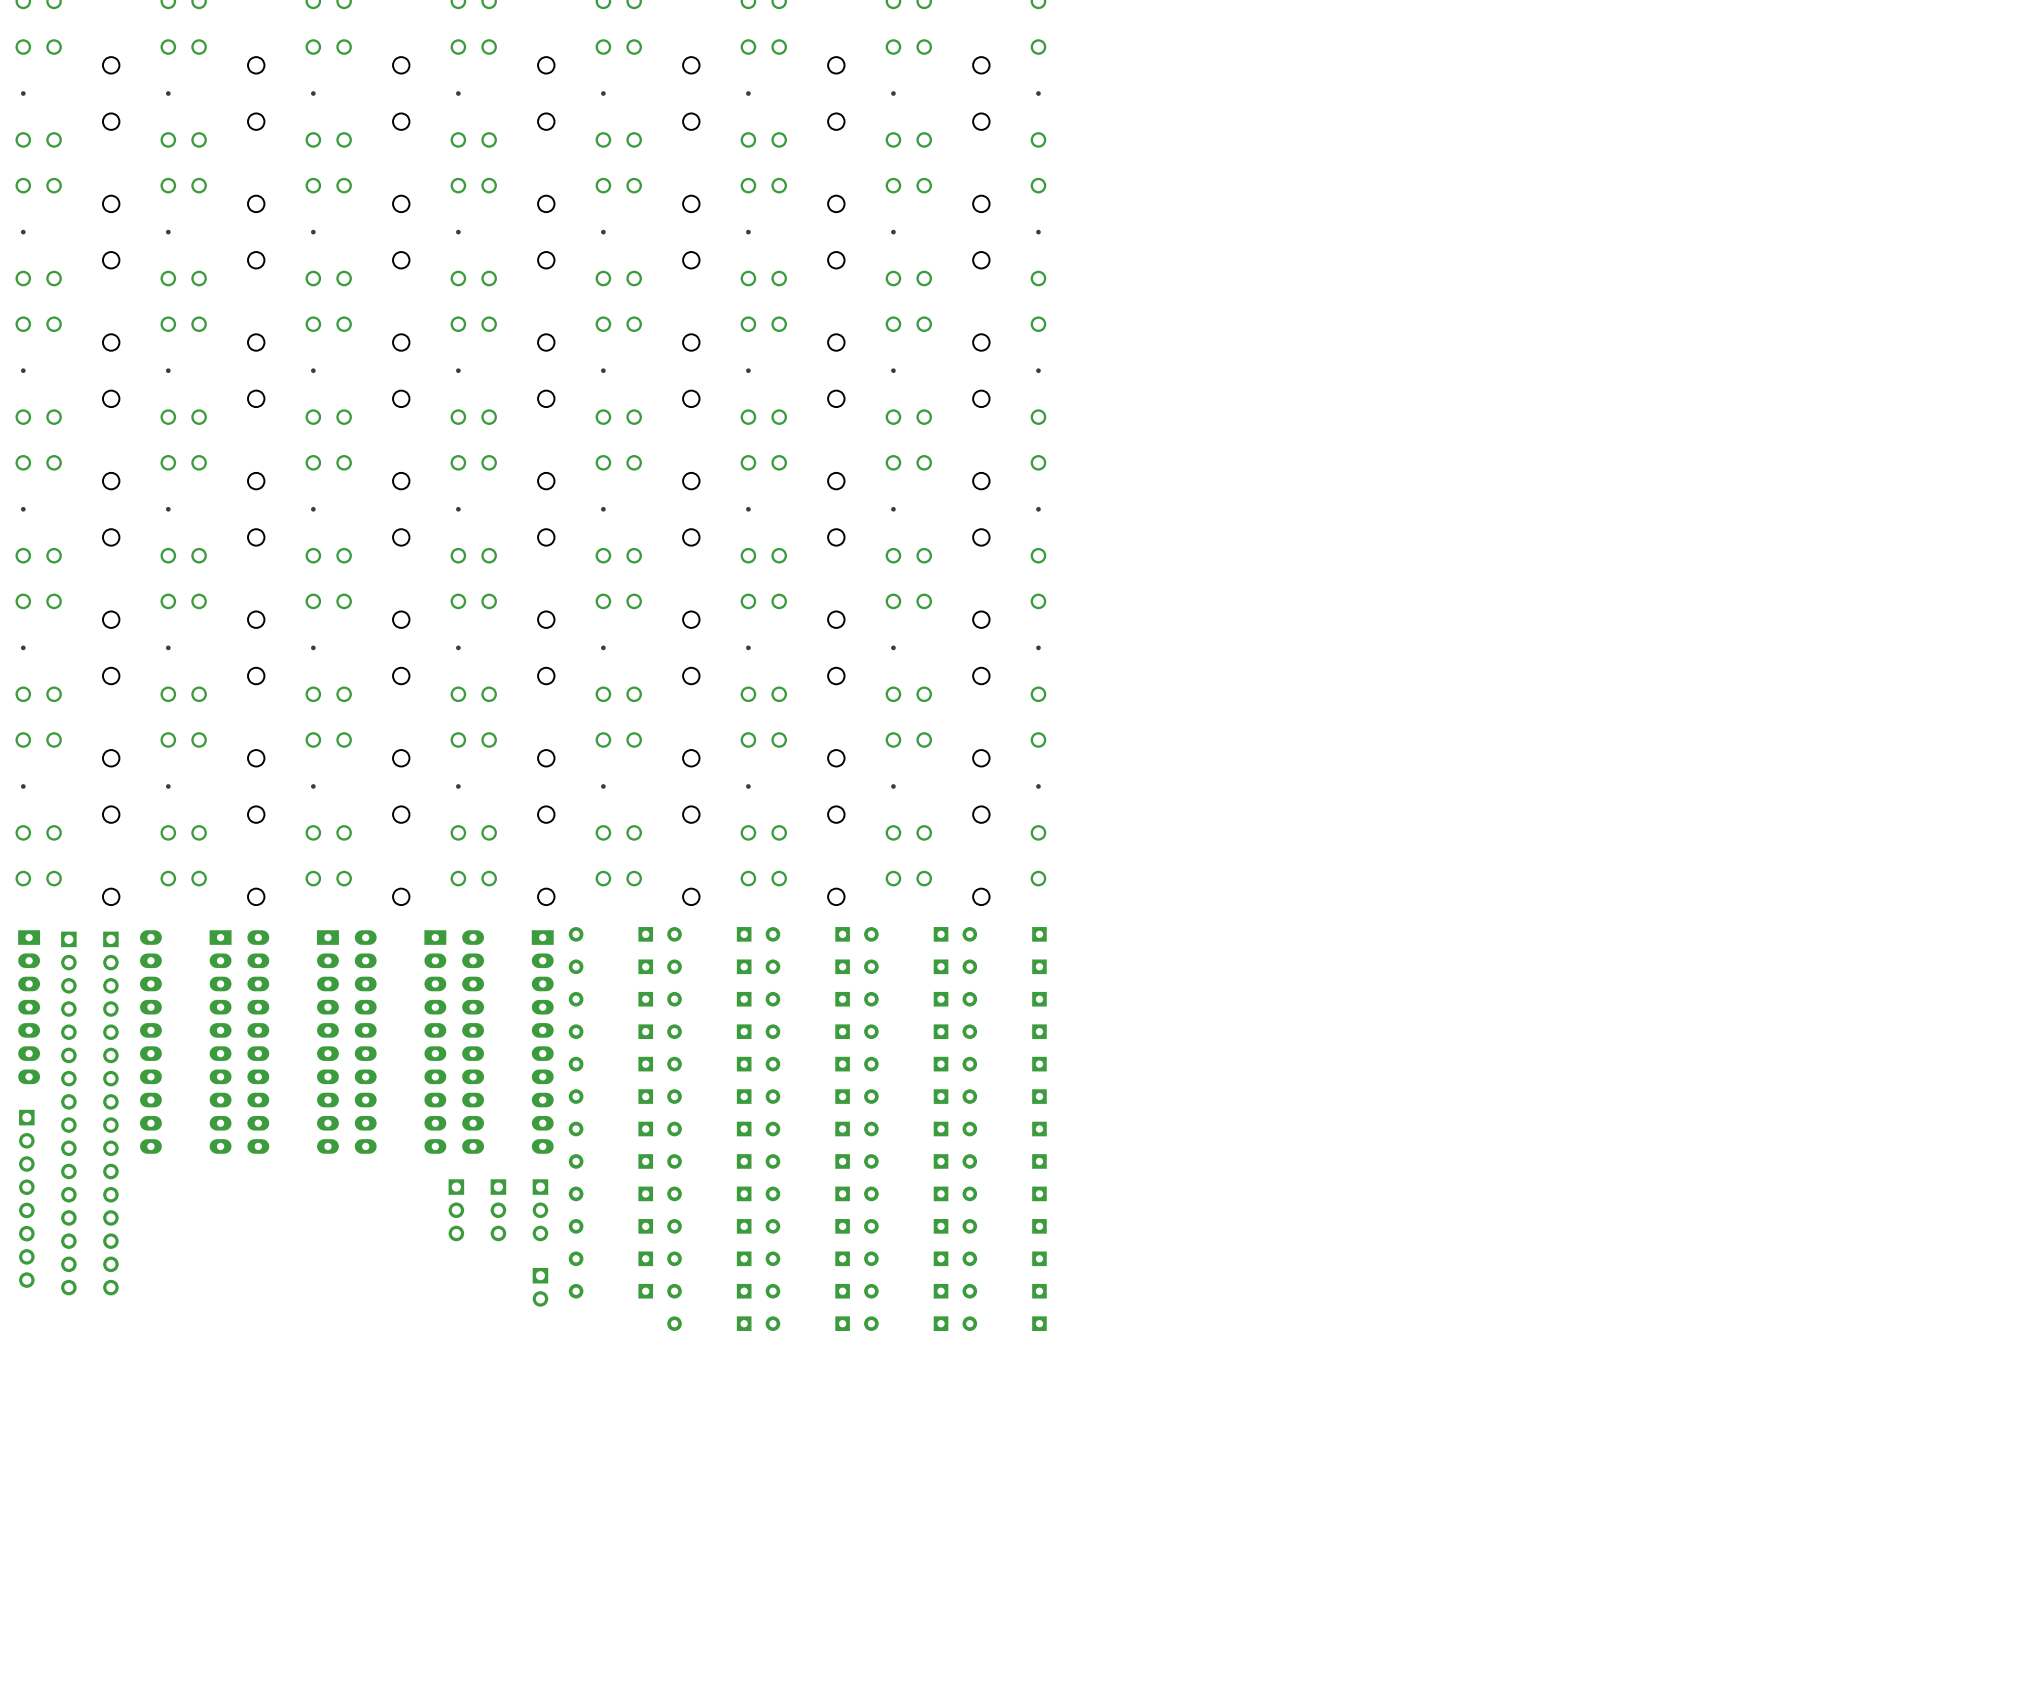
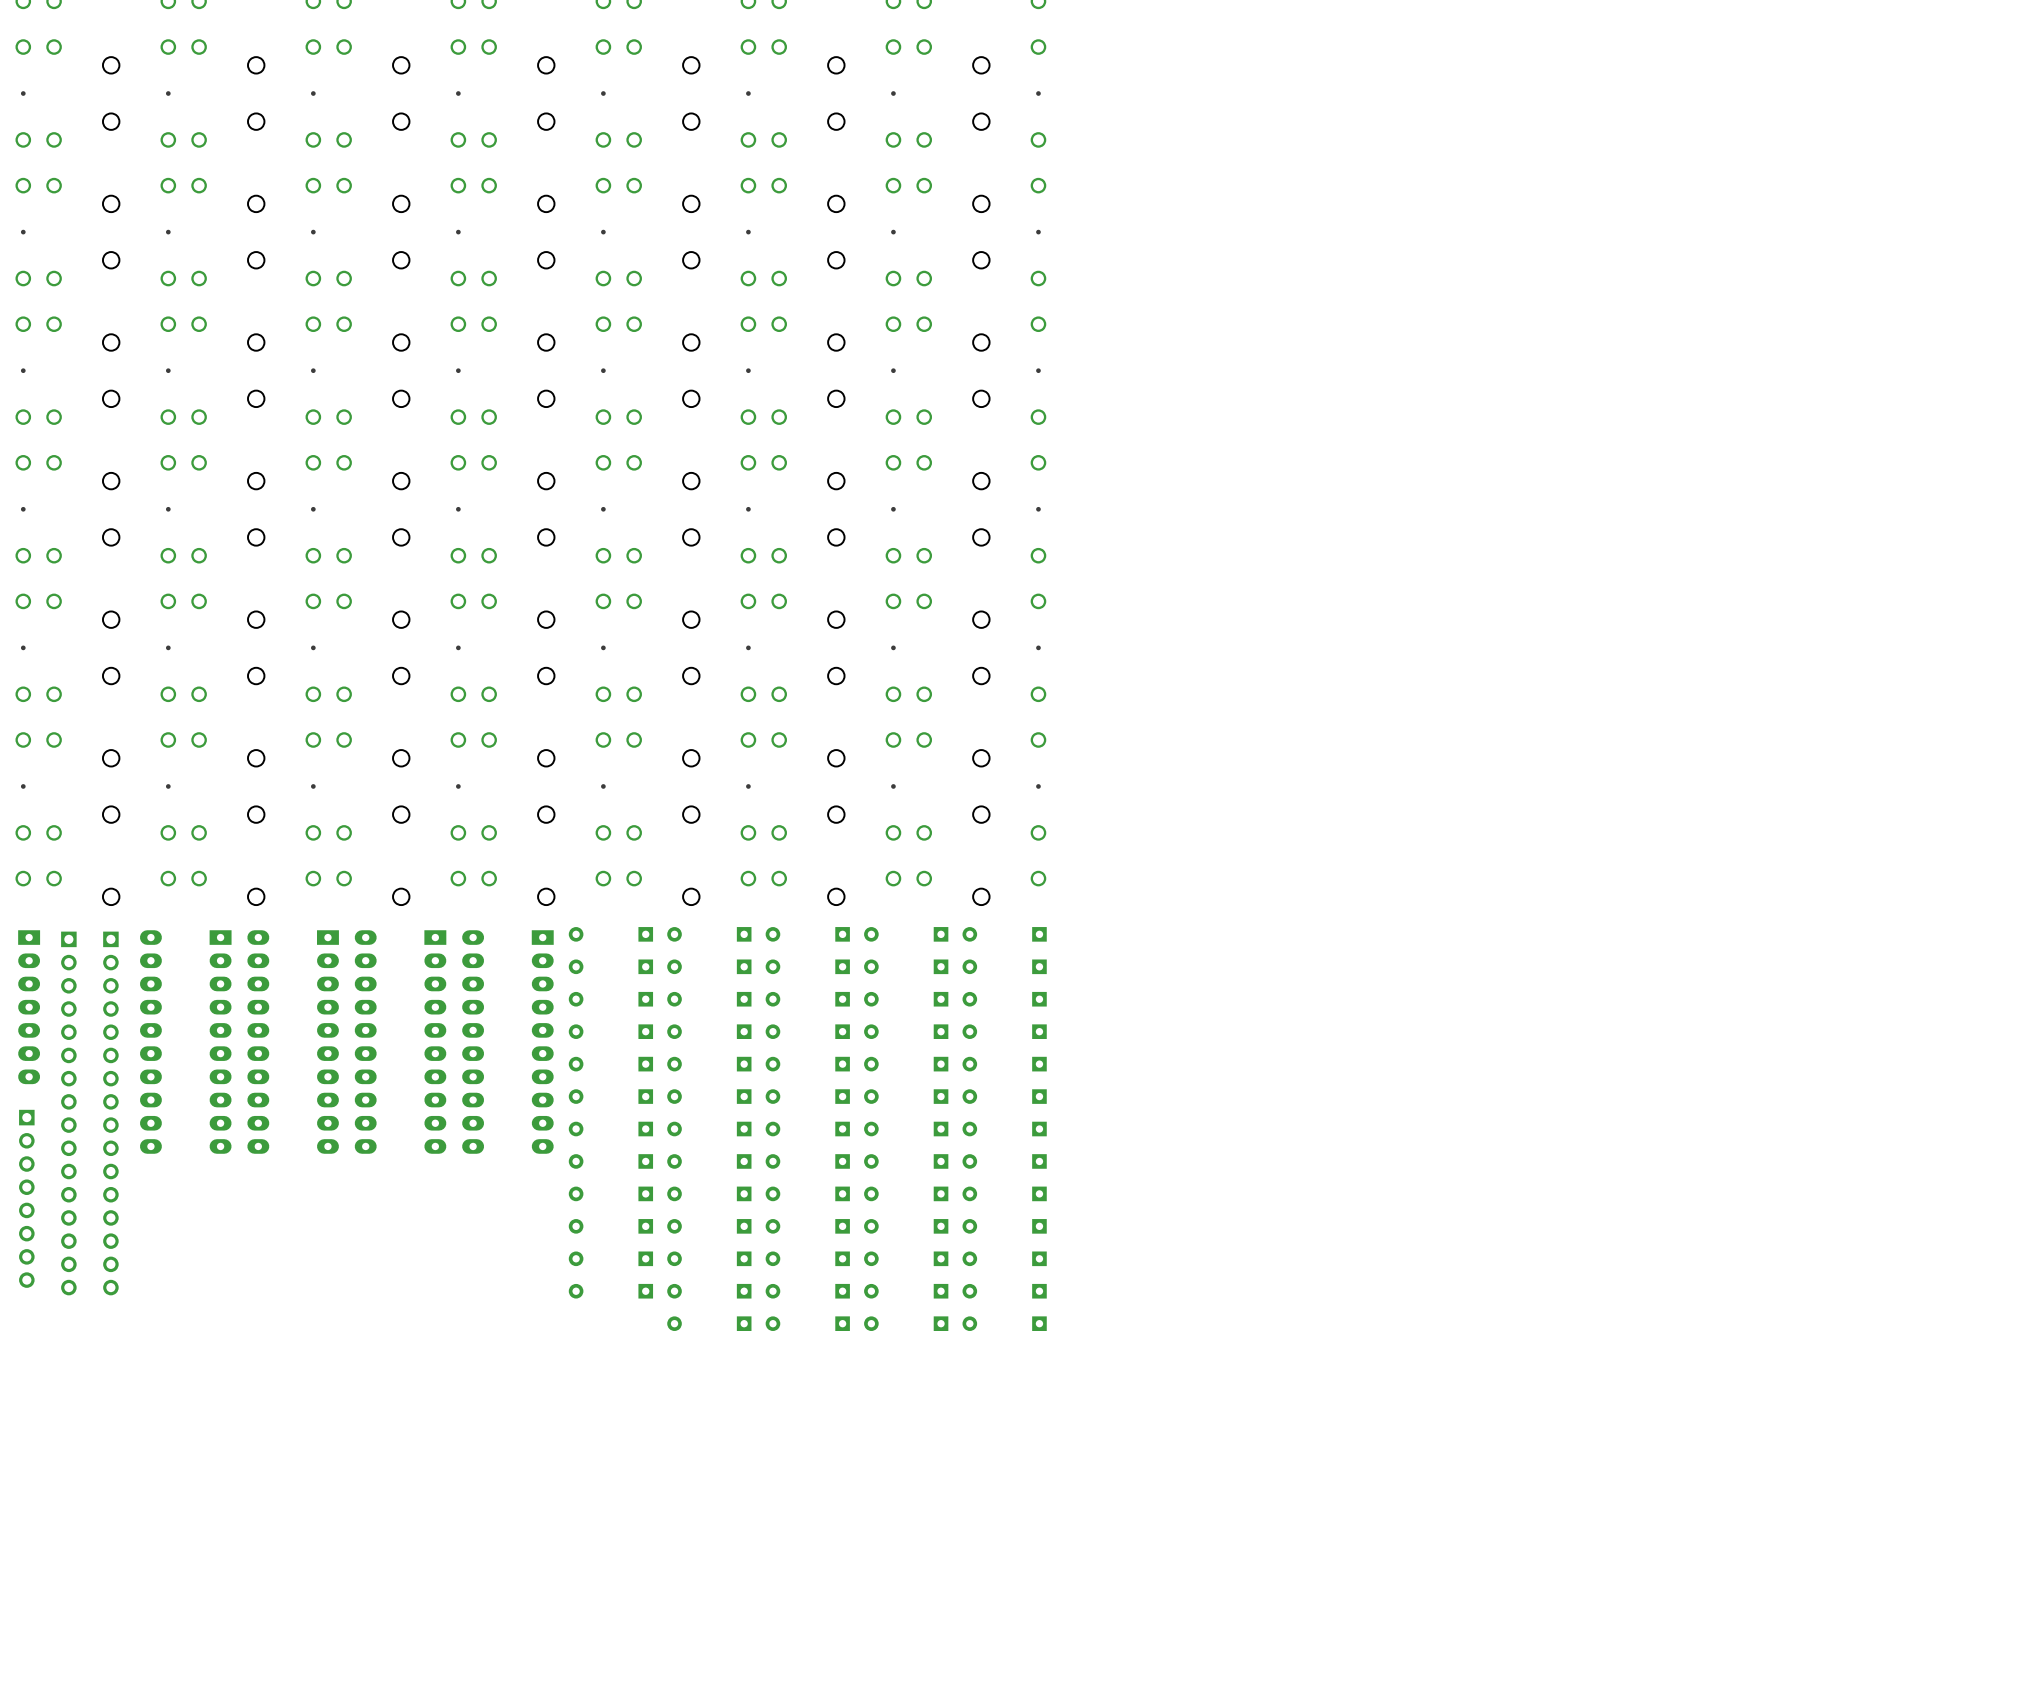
part: (456, 1210) -> none
part: (498, 1210) -> none
part: (540, 1210) -> none
part: (540, 1287) -> none

